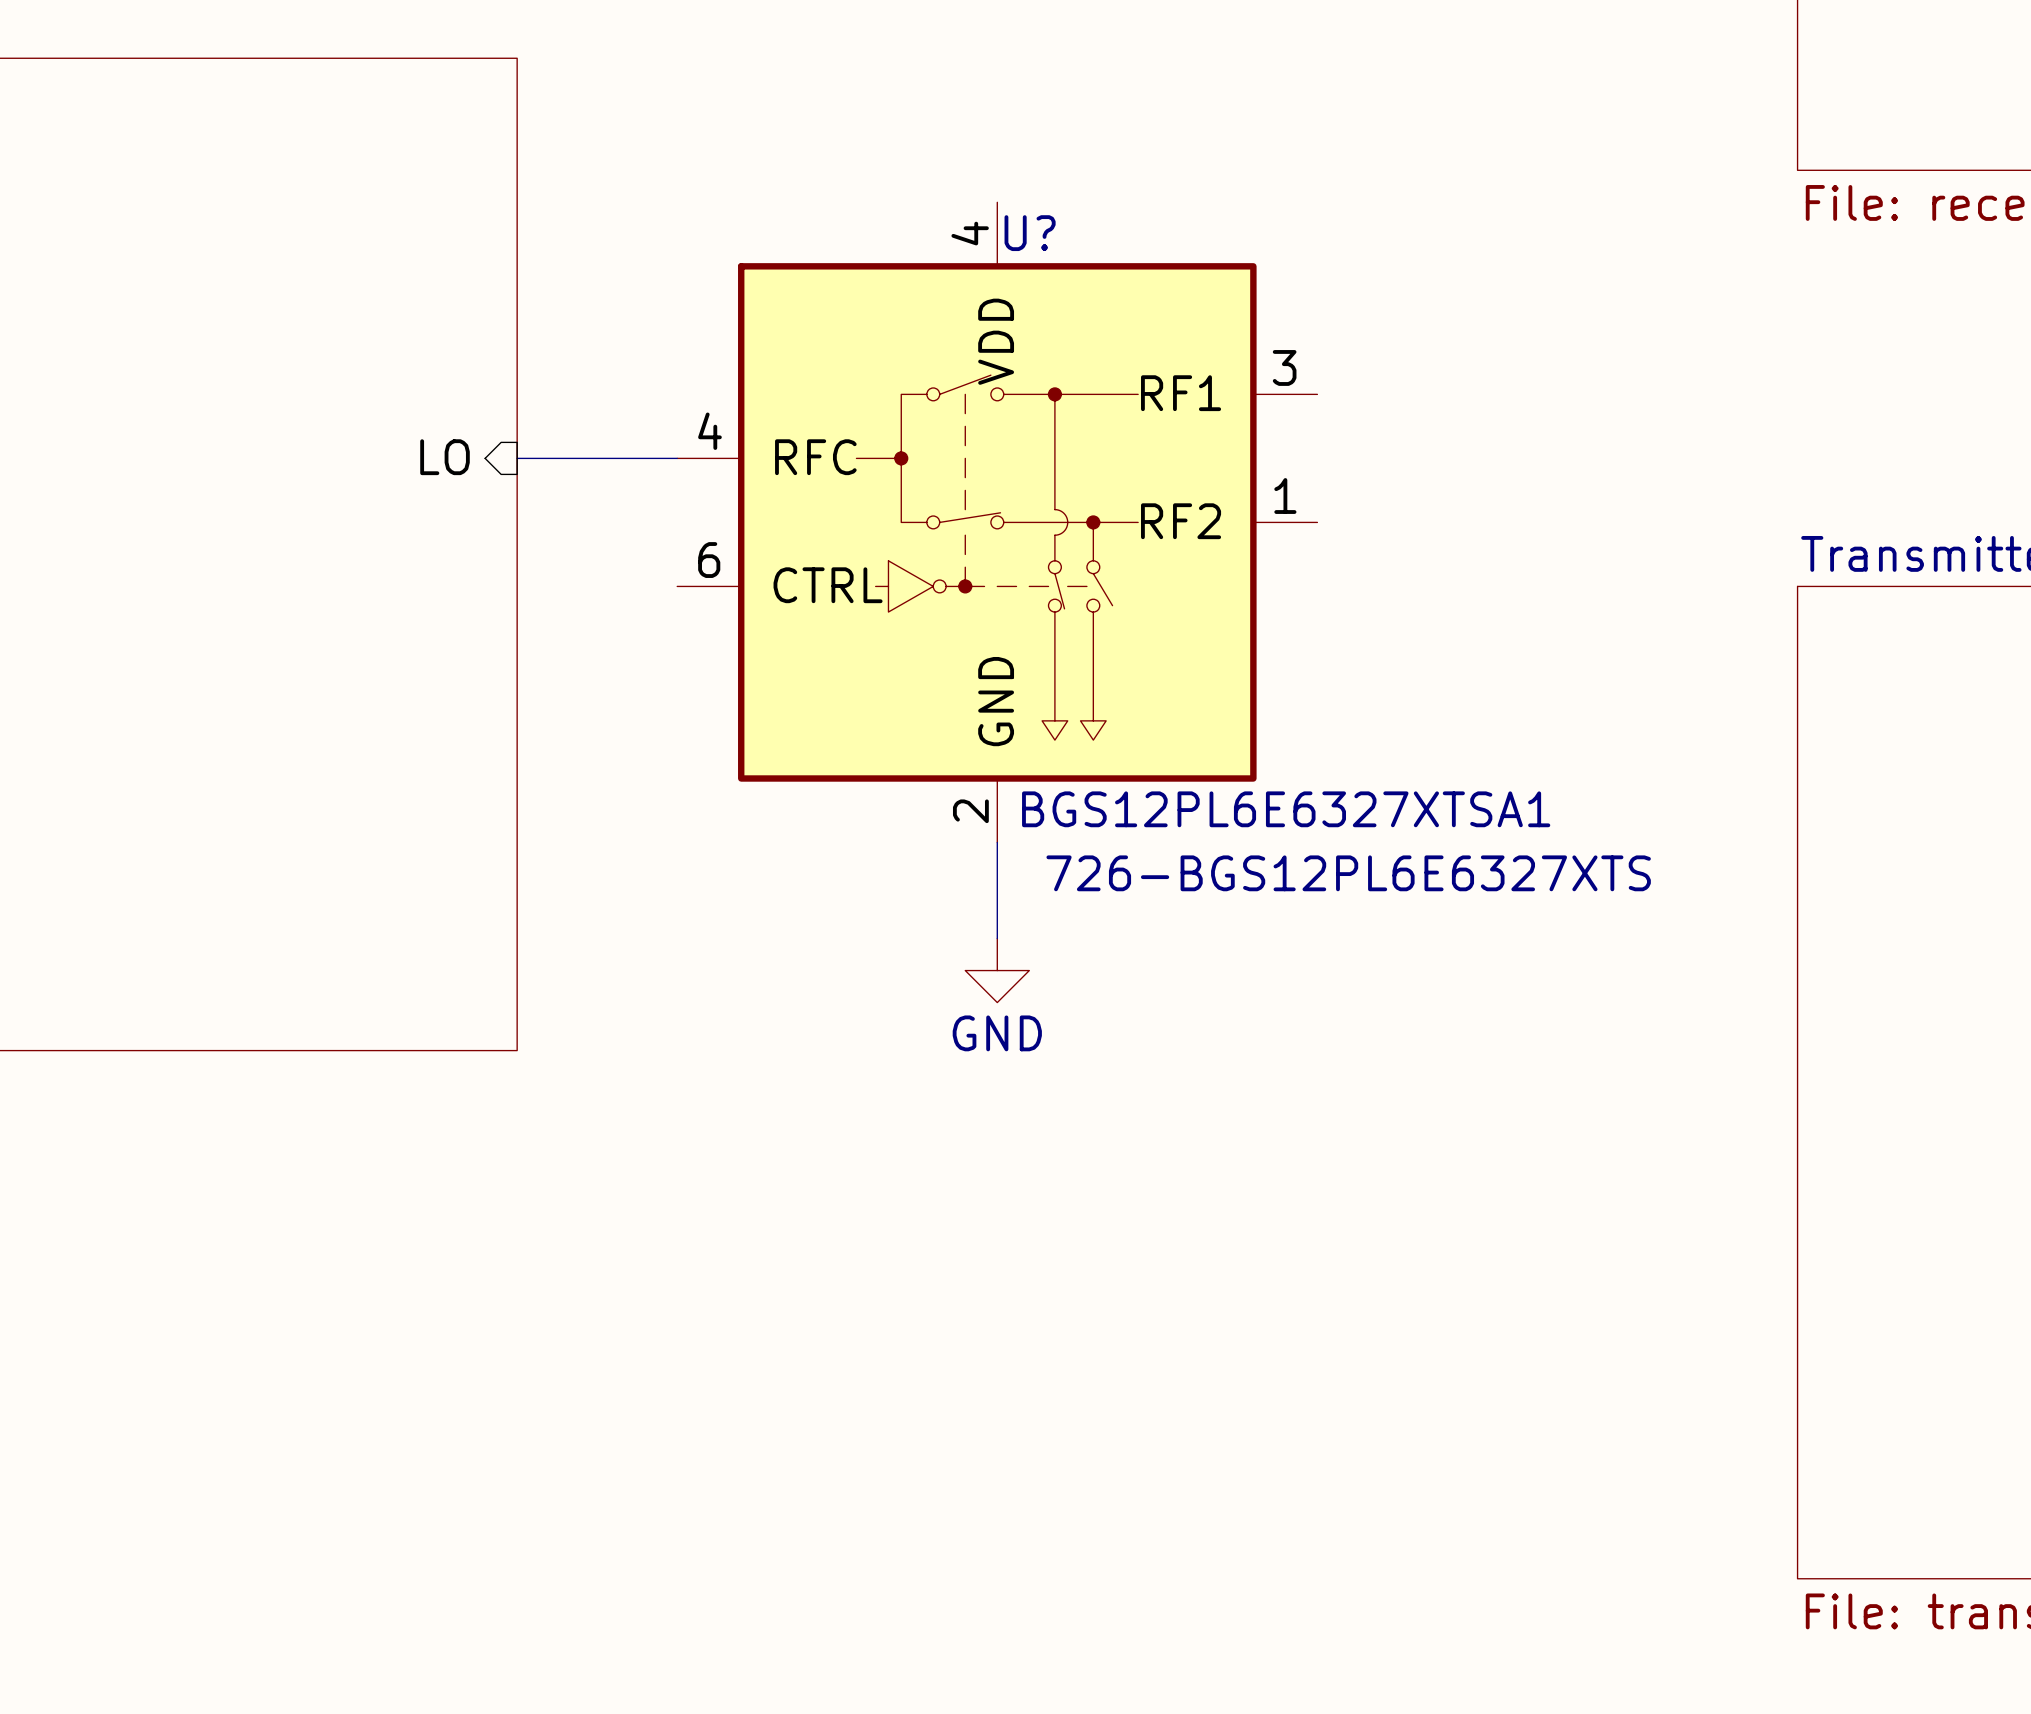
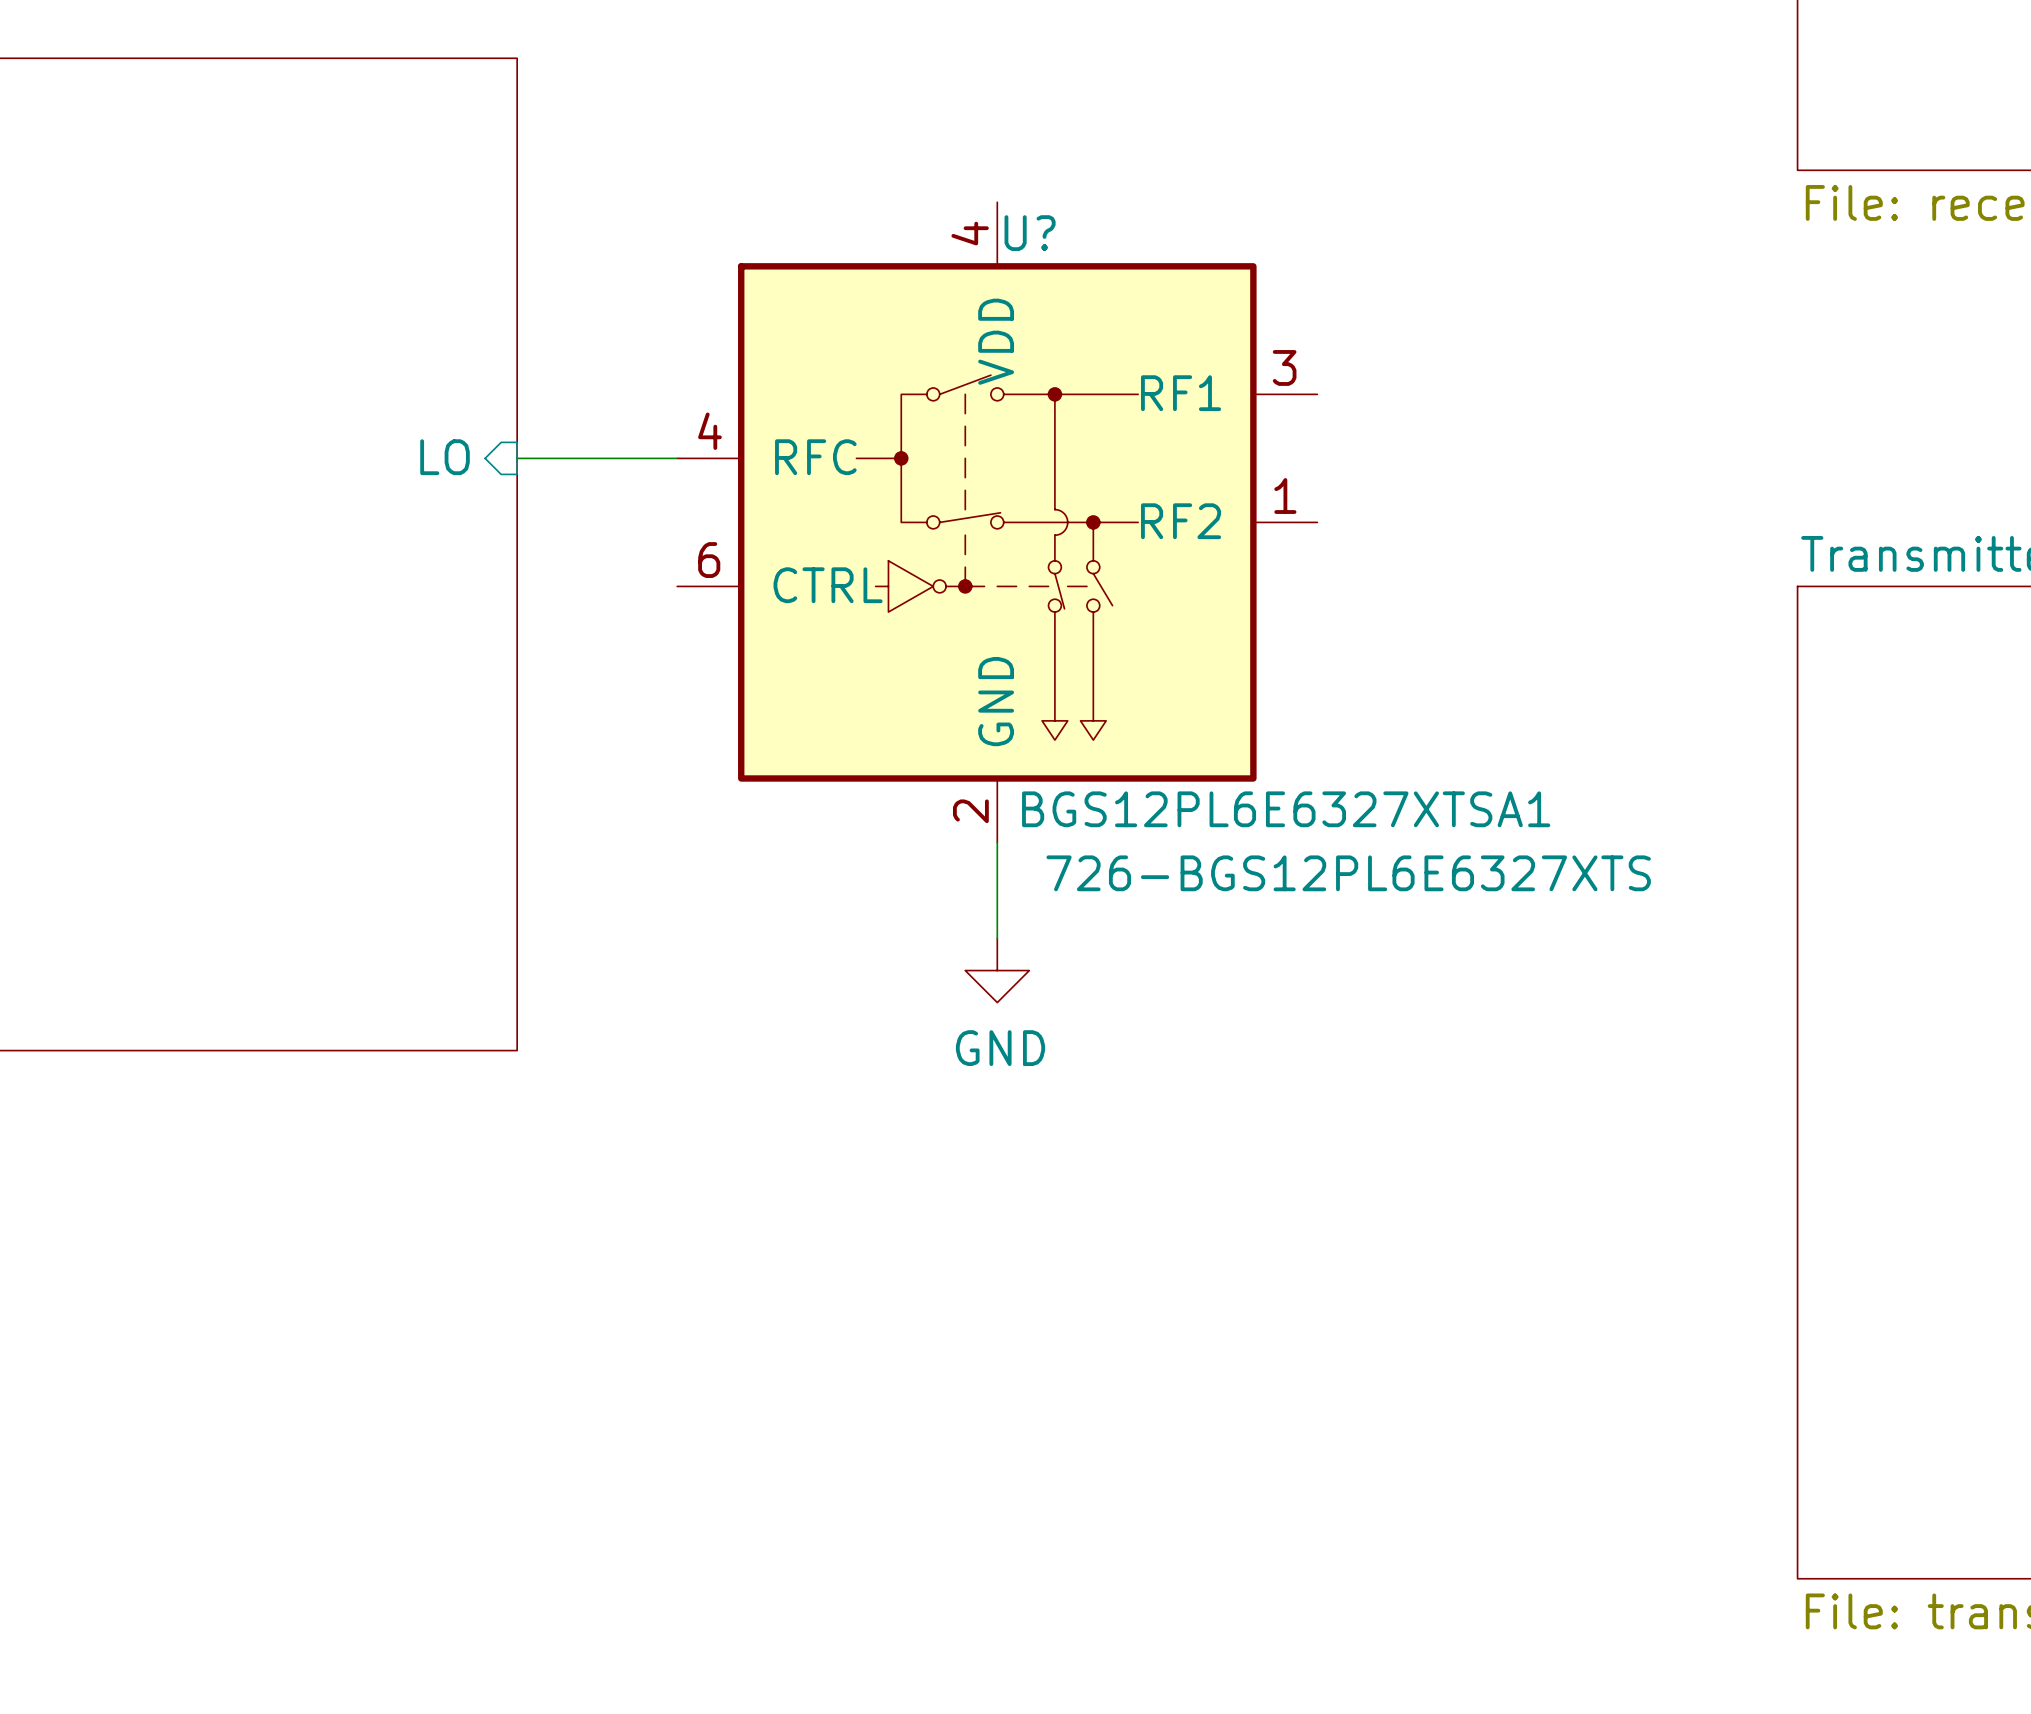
power symbol text position: GND (997, 1033) -> GND (1000, 1048)

